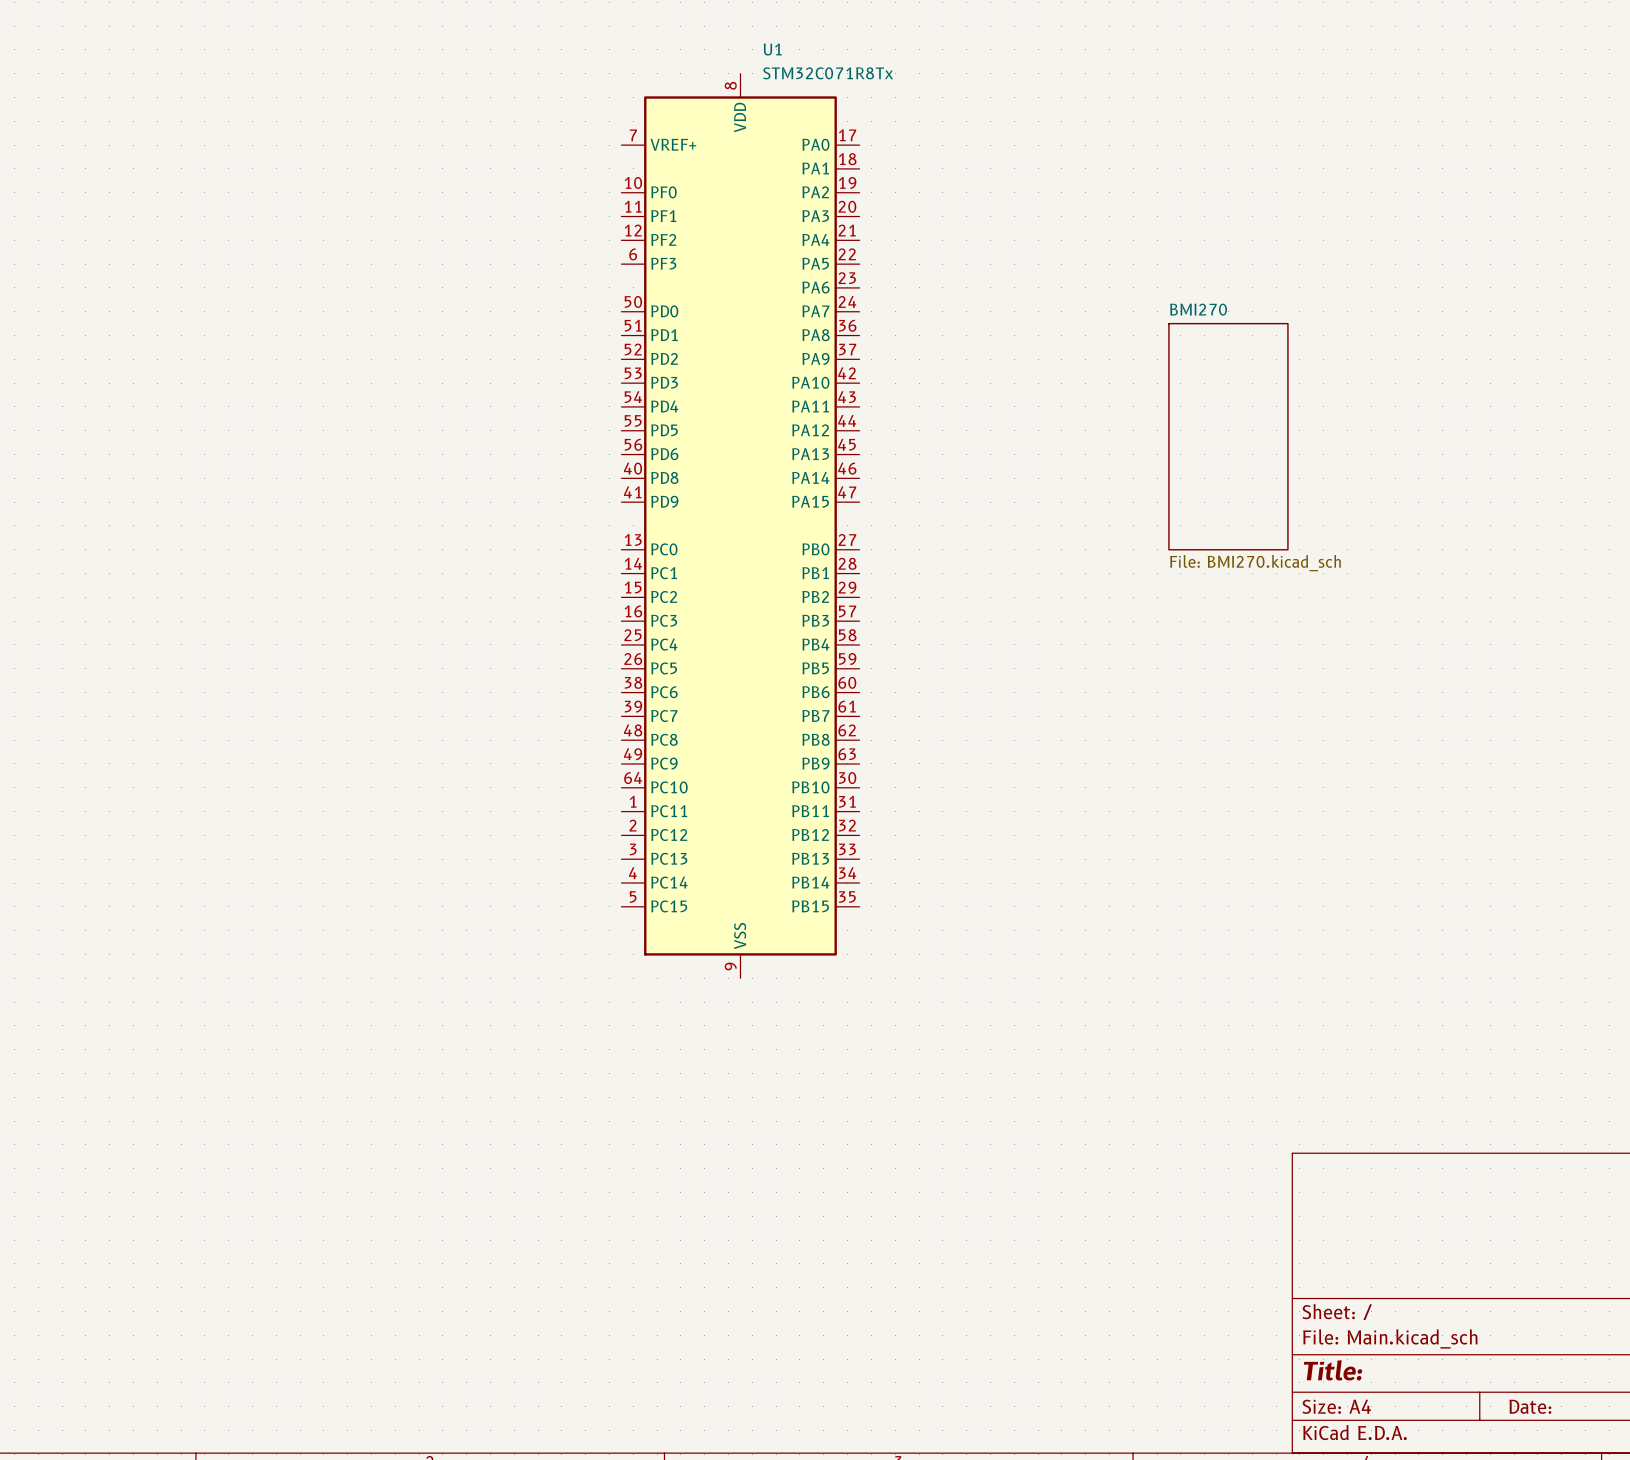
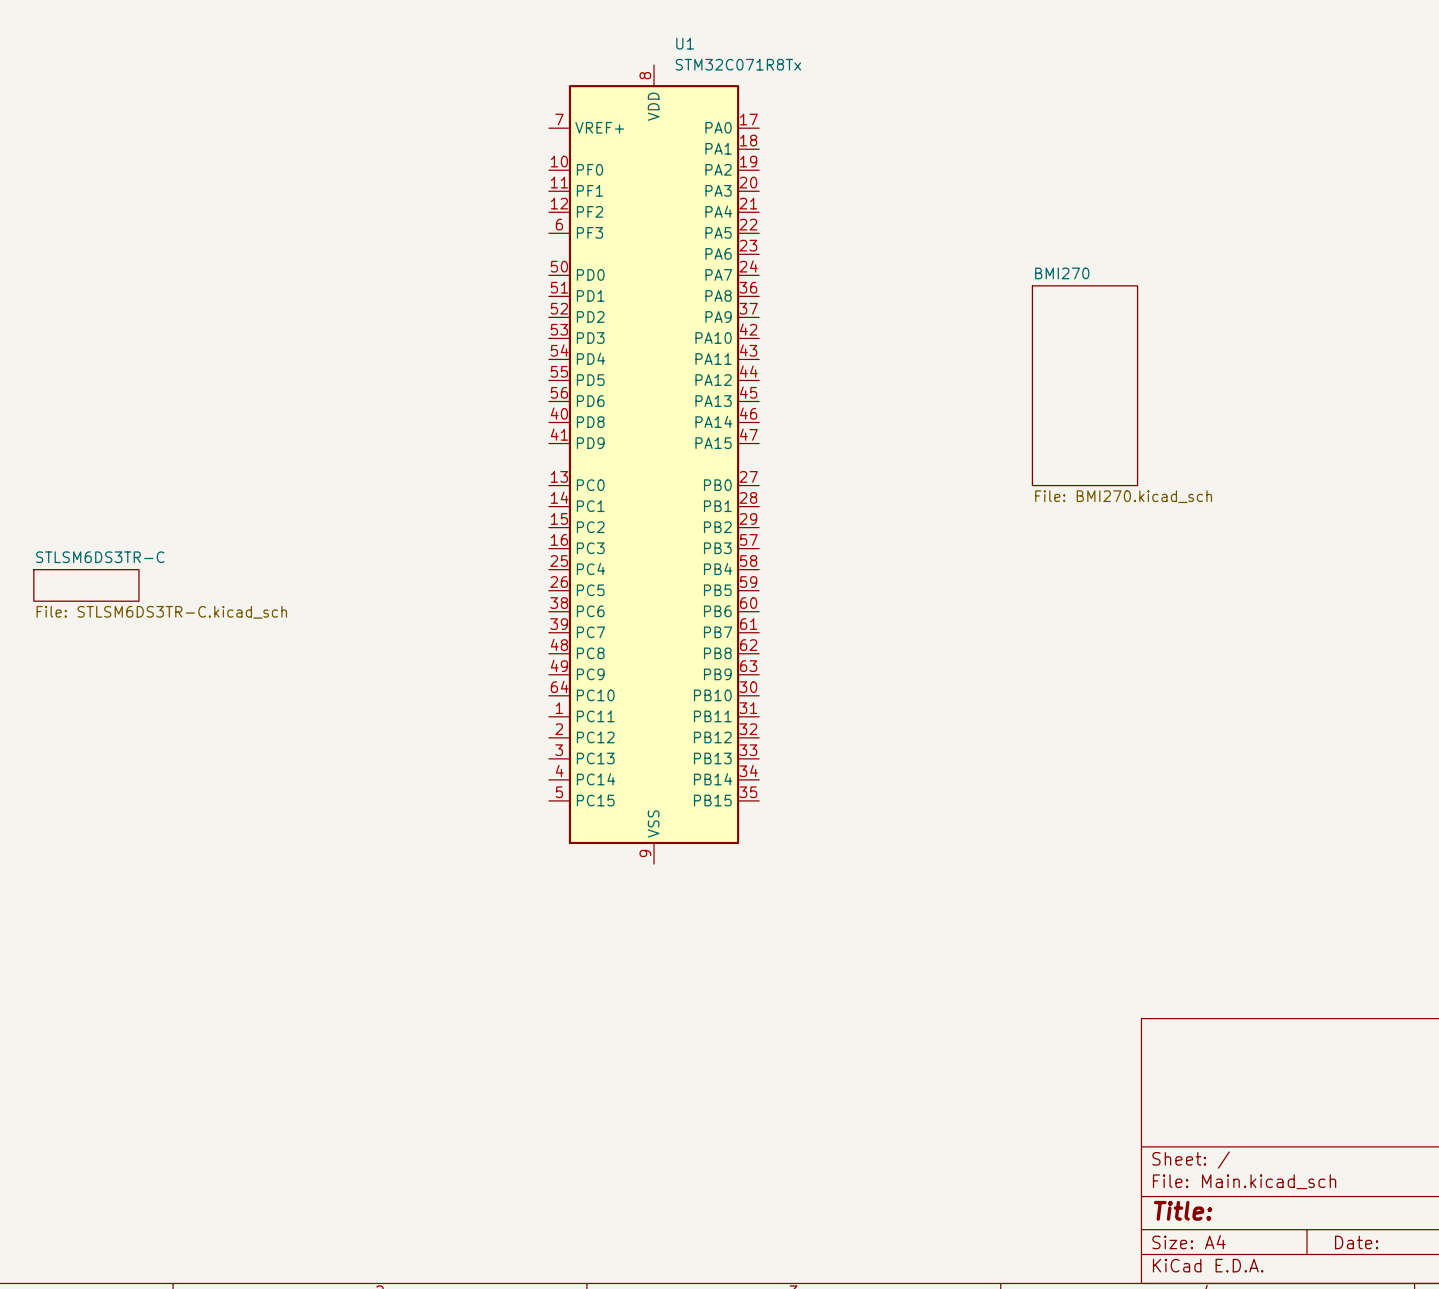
sheet STLSM6DS3TR-C: none -> File: STLSM6DS3TR-C.kicad_sch (86, 585)

